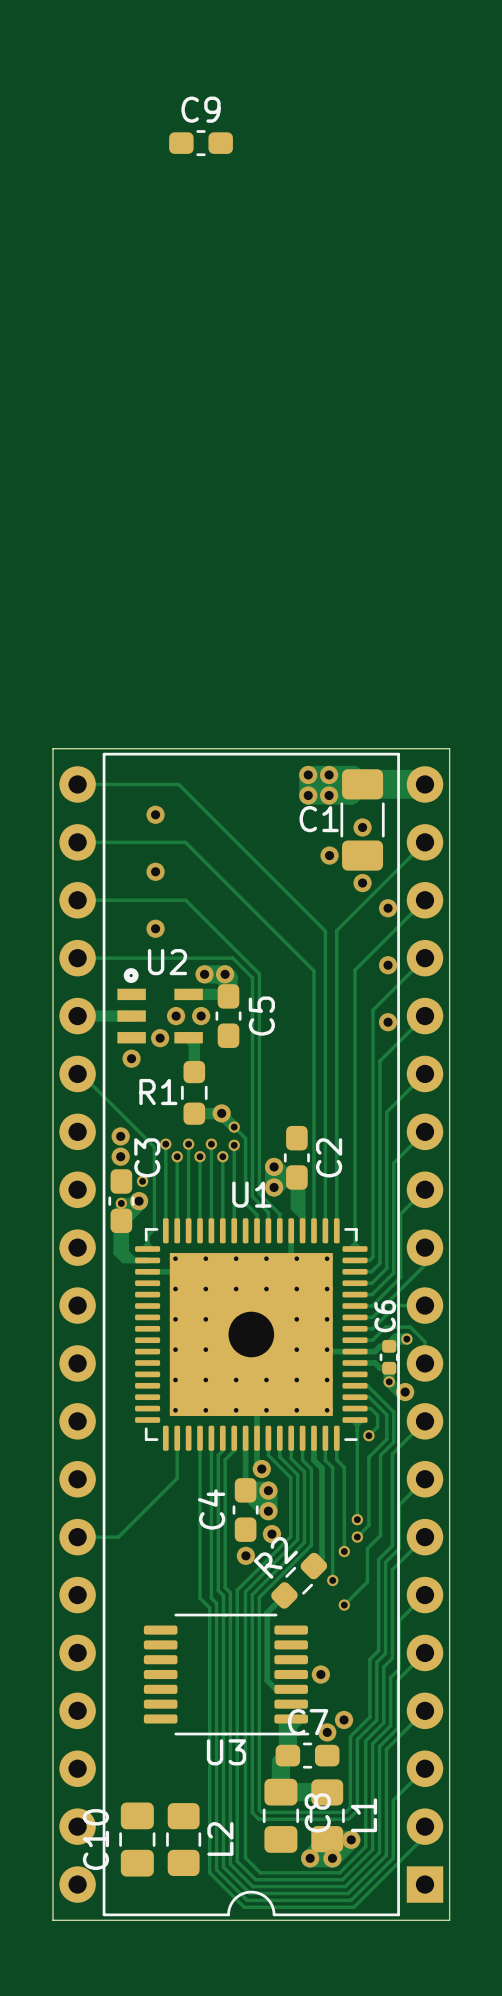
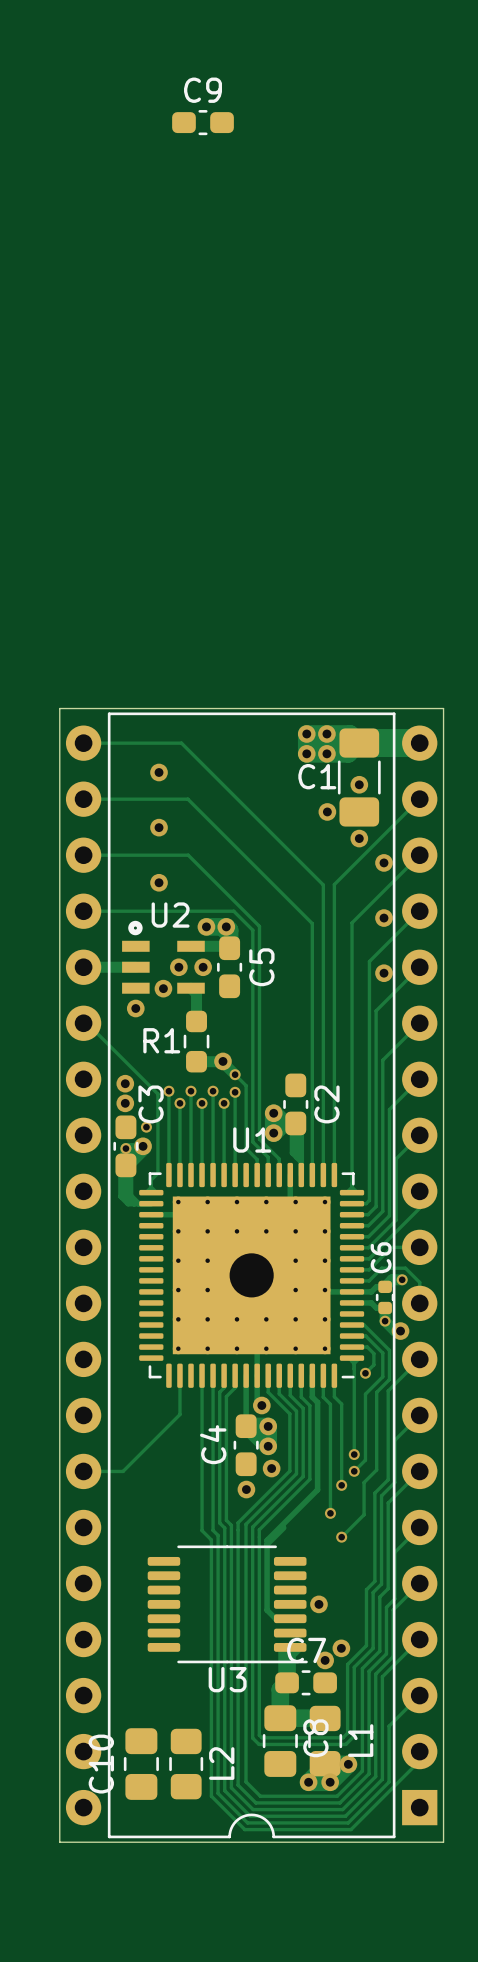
track: (319, 1465) (322, 1468) (322, 1557) (313, 1566) -> (317, 1402) (317, 1489) (267, 1540) (267, 1544)
R2: (299, 1580) -> none

